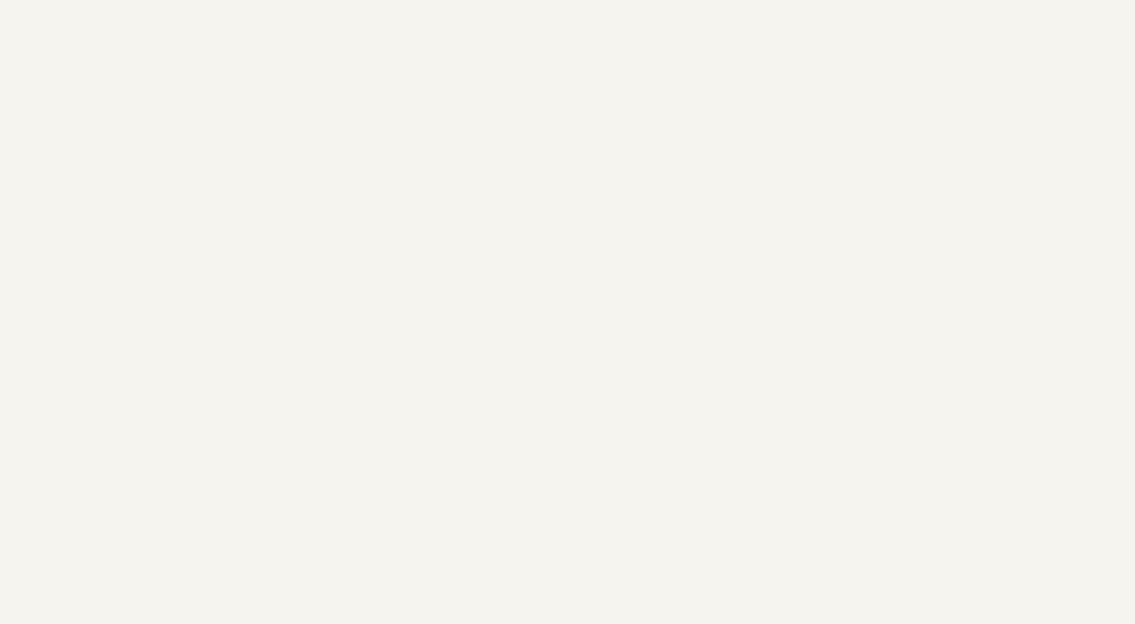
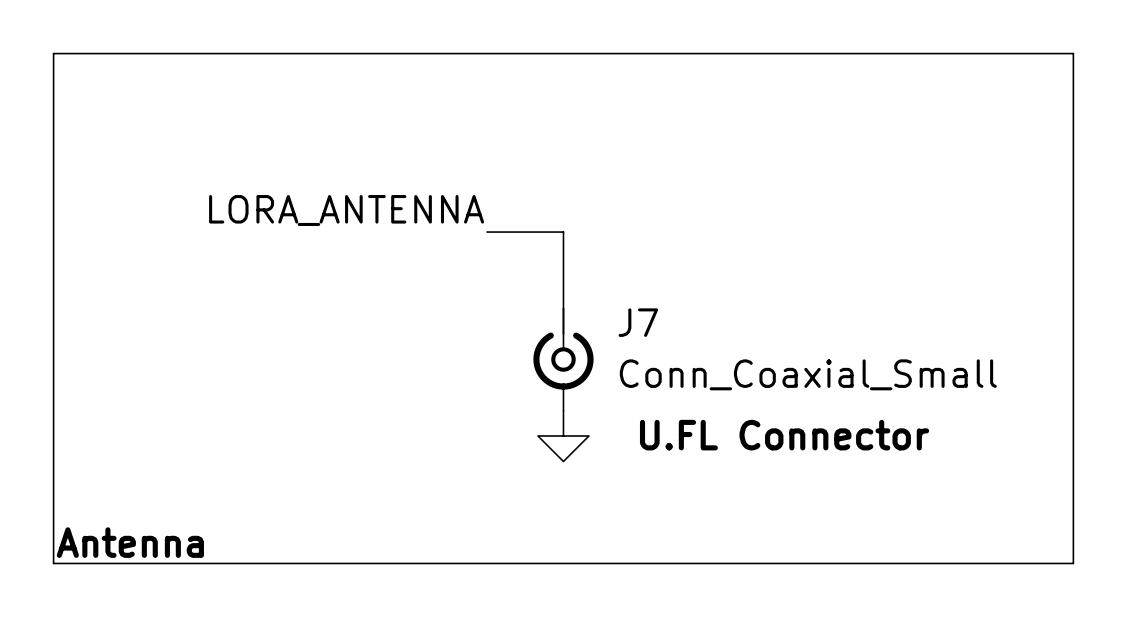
line: none -> (53, 53) (1073, 53) (1073, 563) (53, 563) (53, 53)
label: none -> LORA_ANTENNA (346, 210)
wire: none -> (486, 232) (563, 232) (563, 308)
J7: none -> Conn_Coaxial_Small (563, 359)
text: none -> U.FL Connector (784, 435)
power symbol: none -> (563, 436)
text: none -> Antenna (130, 542)

